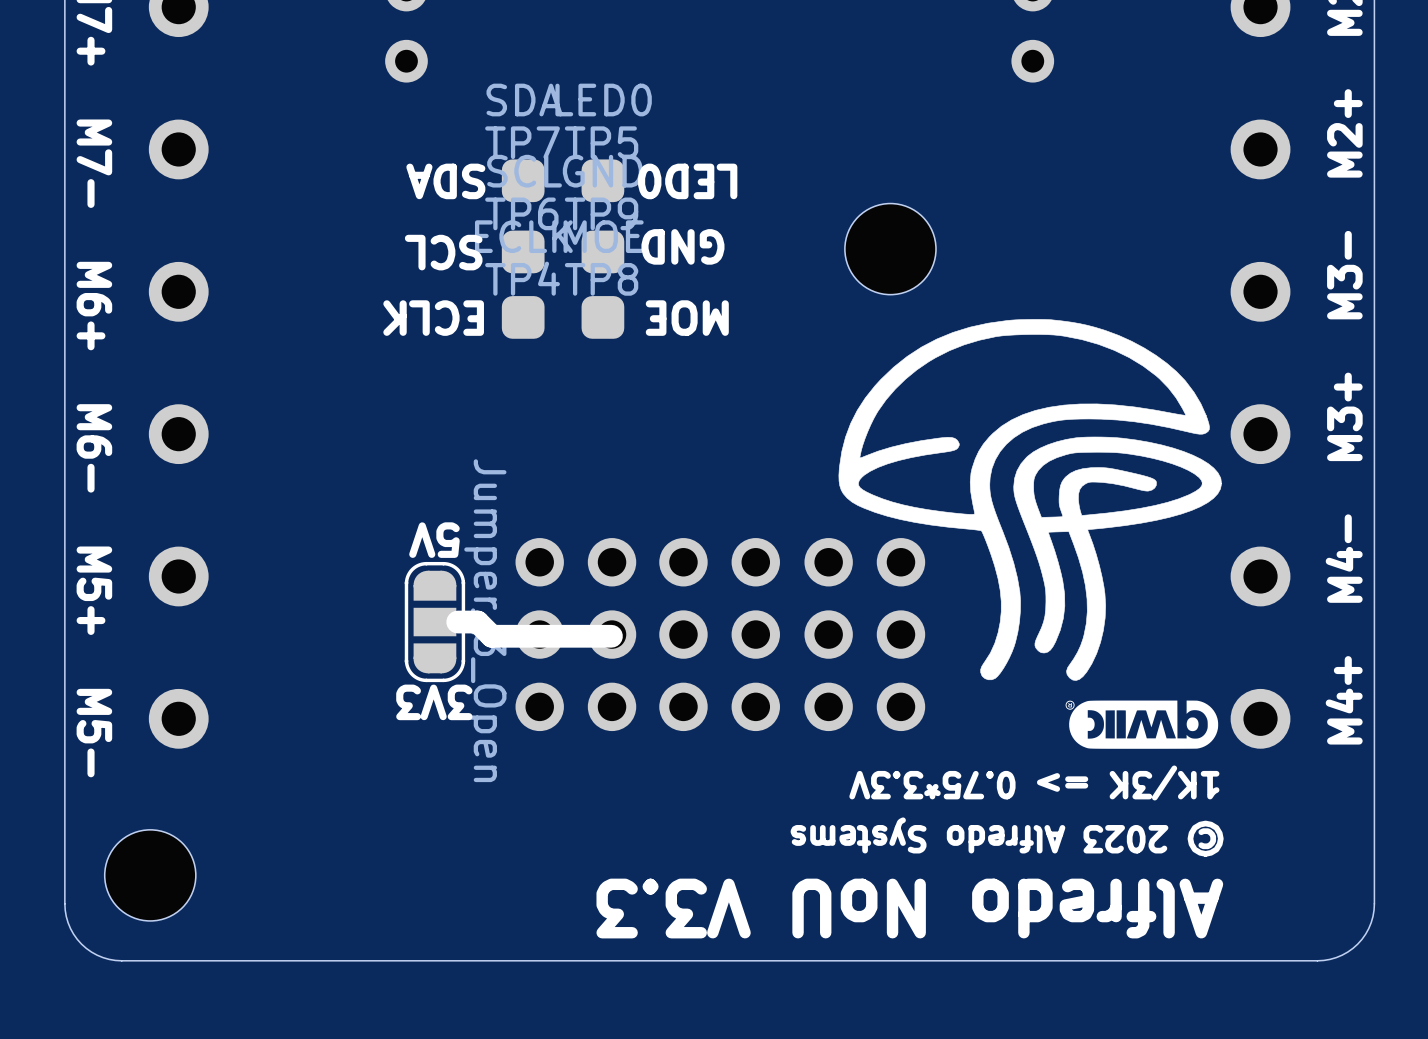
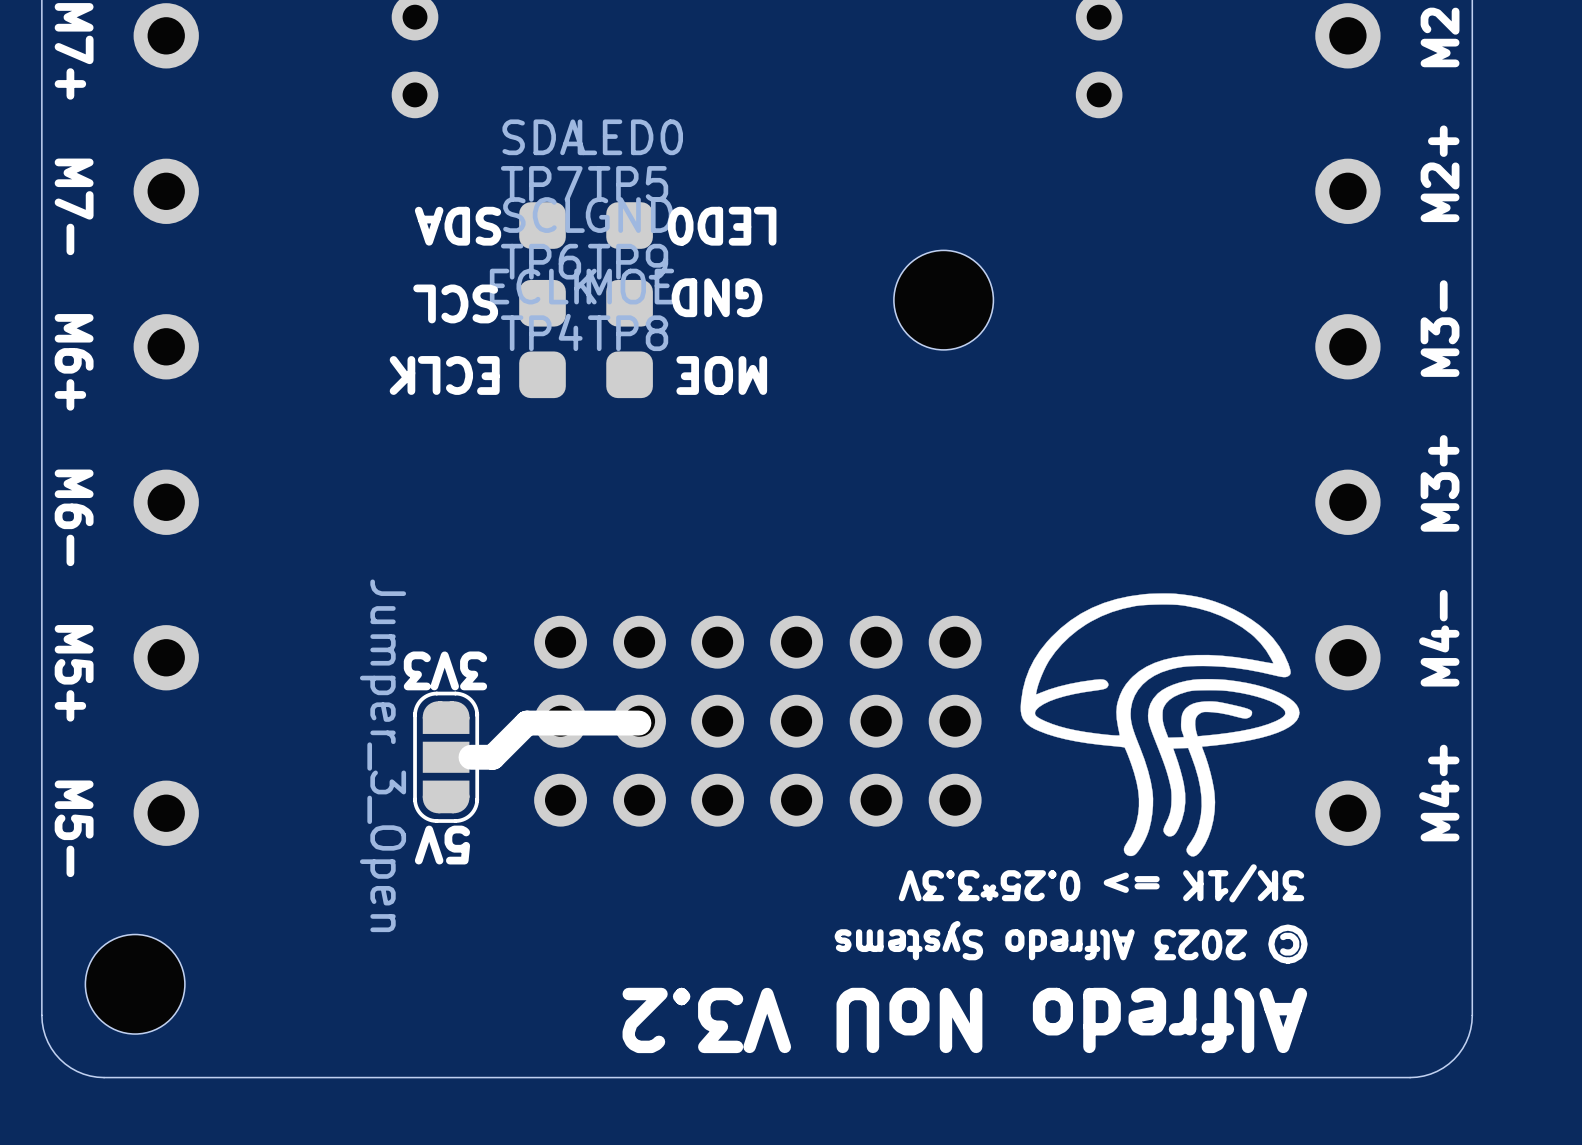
drawing: [838, 319, 1222, 749] -> none
drawing: none -> [1020, 593, 1300, 857]
text position: 5V (434, 540) -> 5V (442, 845)
part value position: Jumper_3_Open (485, 620) -> Jumper_3_Open (383, 755)
part position: (434, 622) -> (446, 757)
line: (457, 622) (477, 622) (491, 636) (508, 636) -> (470, 757) (492, 757) (526, 723)
text position: 3V3 (434, 702) -> 3V3 (445, 670)
text: 1K/3K => 0.75*3.3V (1034, 782) -> 3K/1K => 0.25*3.3V (1101, 883)
text: Alfredo NoU V3.3 (909, 908) -> Alfredo NoU V3.2 (964, 1020)

